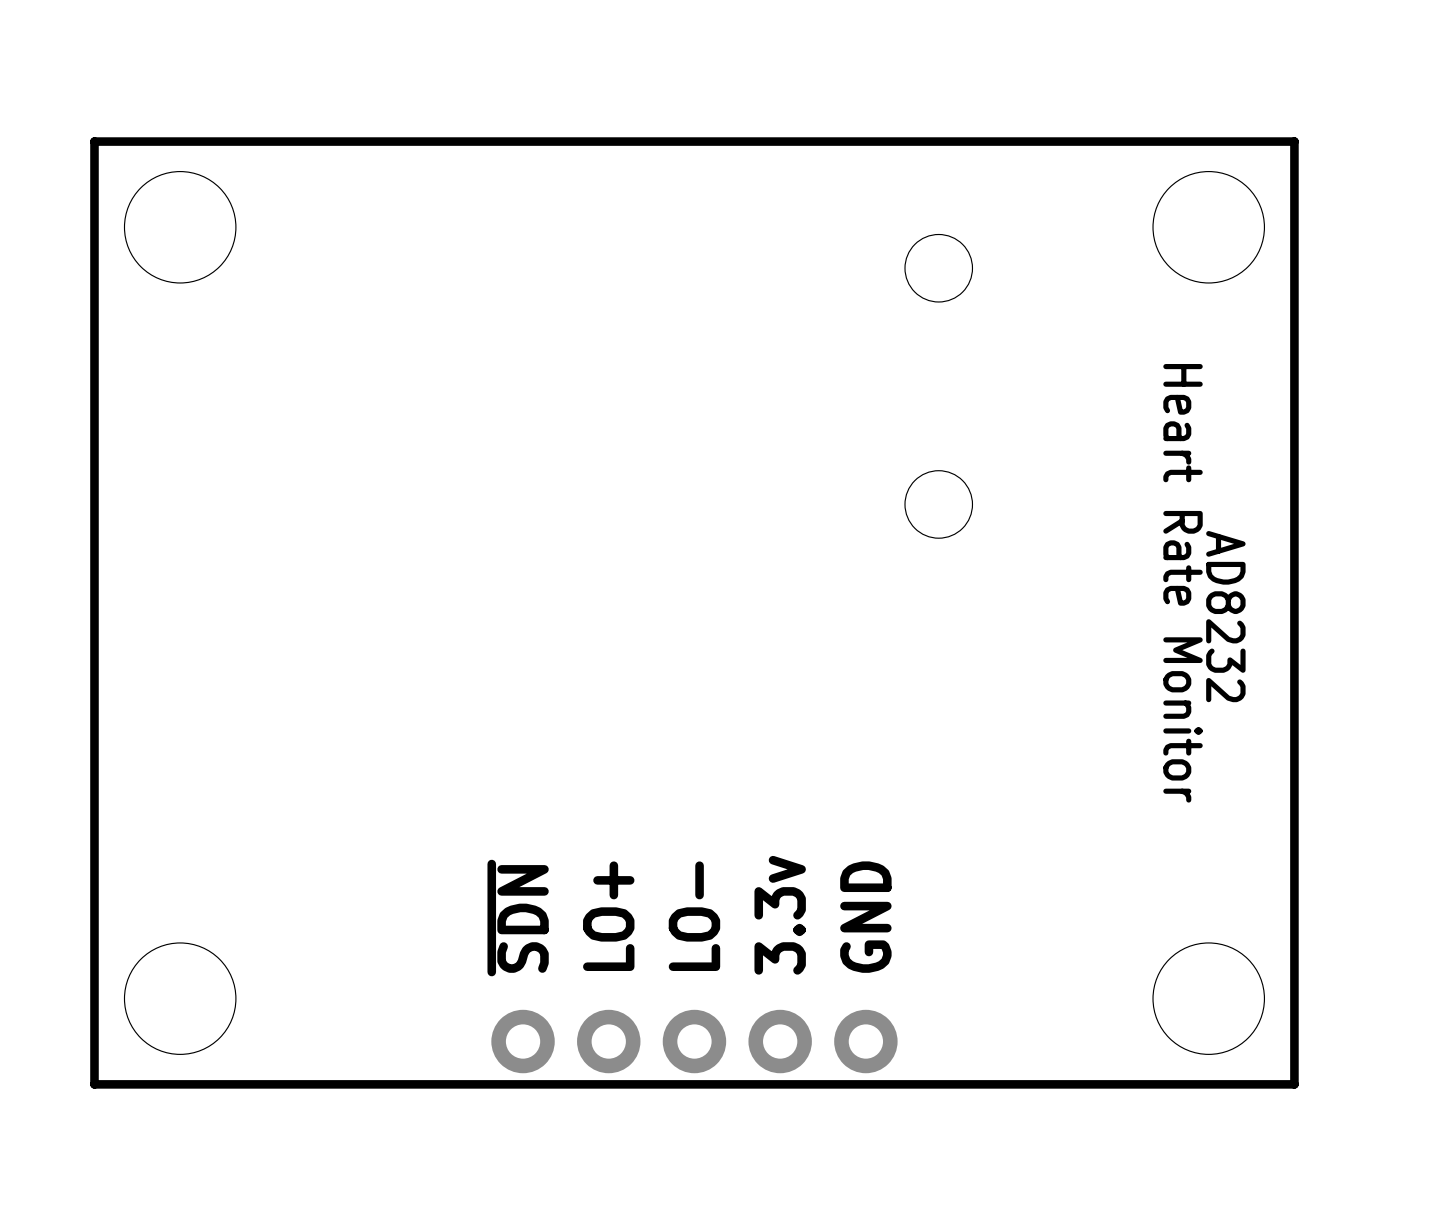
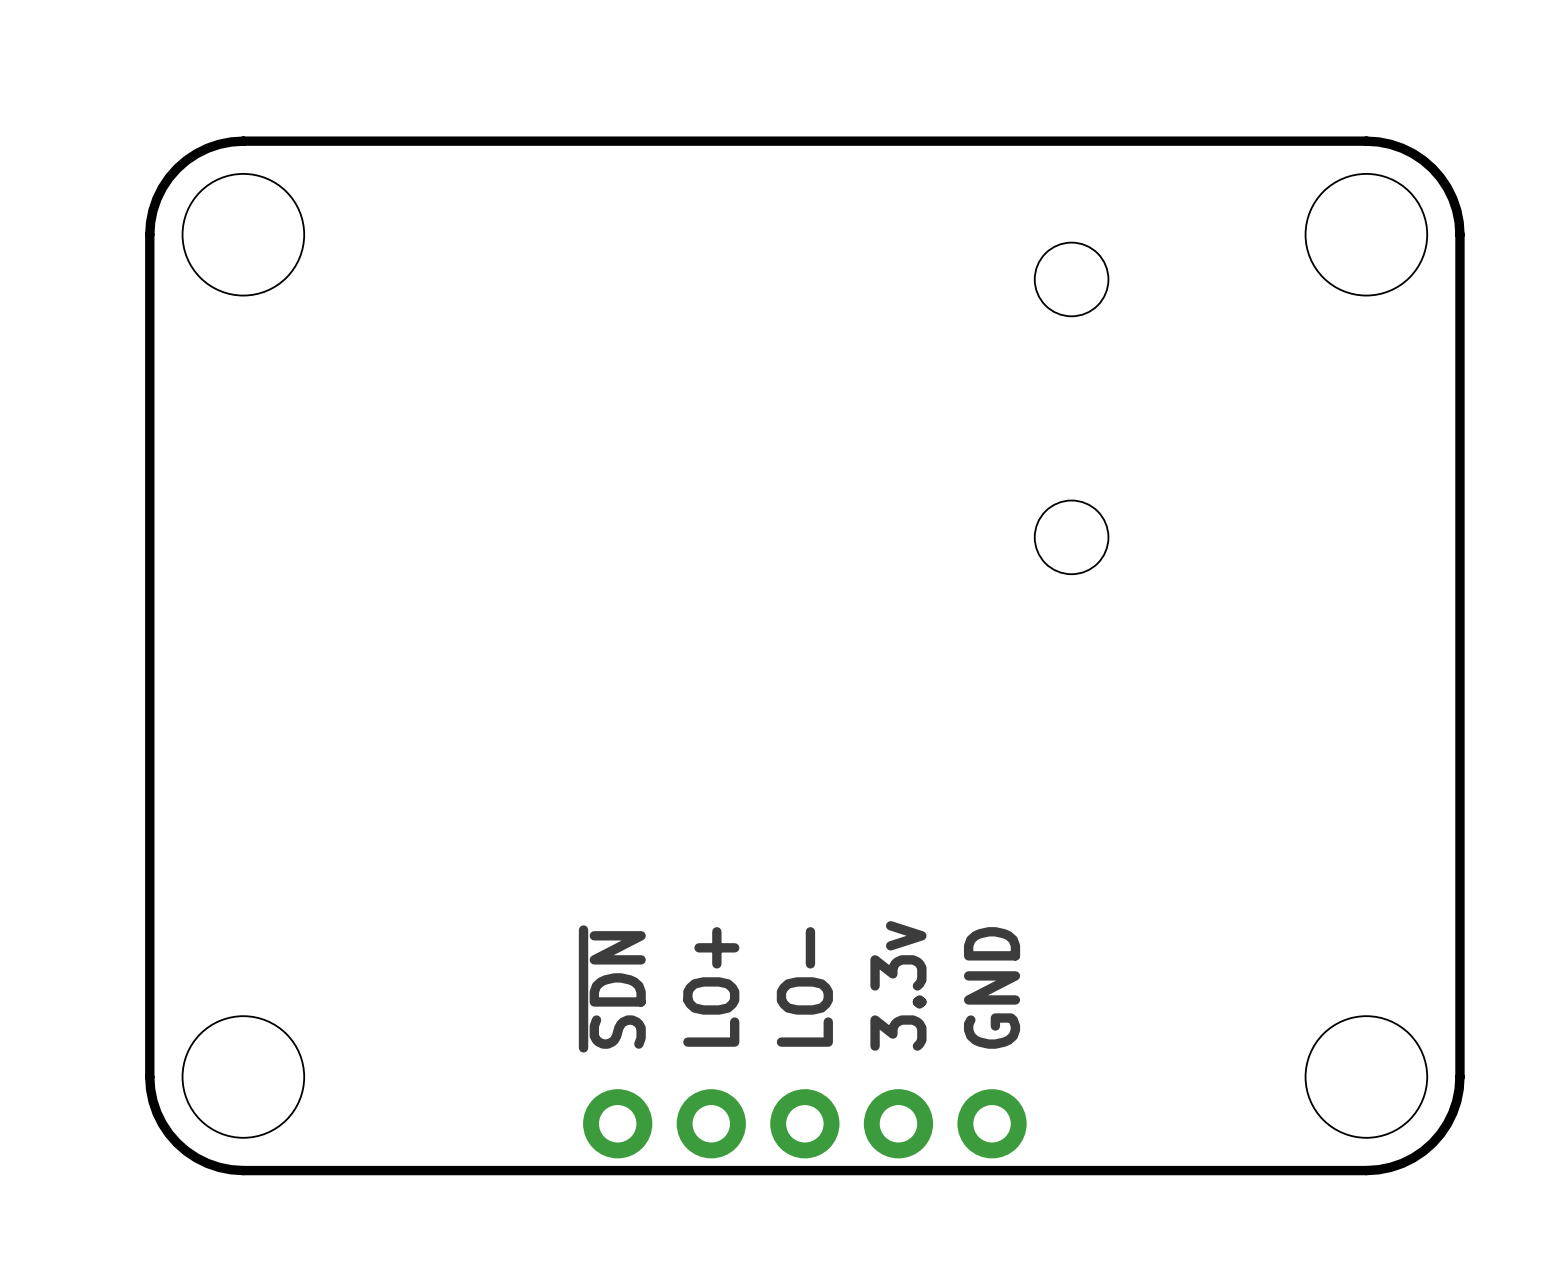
board edge: (180, 141) (94, 141) (94, 227) -> (243, 141) (219, 144) (207, 148) (186, 160) (177, 168) (169, 177) (156, 198) (152, 210) (149, 234)
board edge: (1208, 141) (1294, 141) (1294, 227) -> (1366, 141) (1390, 144) (1402, 148) (1423, 160) (1432, 168) (1440, 177) (1452, 198) (1456, 210) (1459, 234)
text: Heart Rate Monitor (1183, 583) -> none
text: AD8232 (1225, 616) -> none
board edge: (94, 998) (94, 1084) (180, 1084) -> (149, 1076) (152, 1101) (156, 1112) (169, 1133) (177, 1143) (186, 1151) (207, 1163) (219, 1167) (243, 1170)
board edge: (1294, 998) (1294, 1084) (1208, 1084) -> (1459, 1076) (1456, 1101) (1452, 1112) (1440, 1133) (1432, 1143) (1423, 1151) (1402, 1163) (1390, 1167) (1366, 1170)

